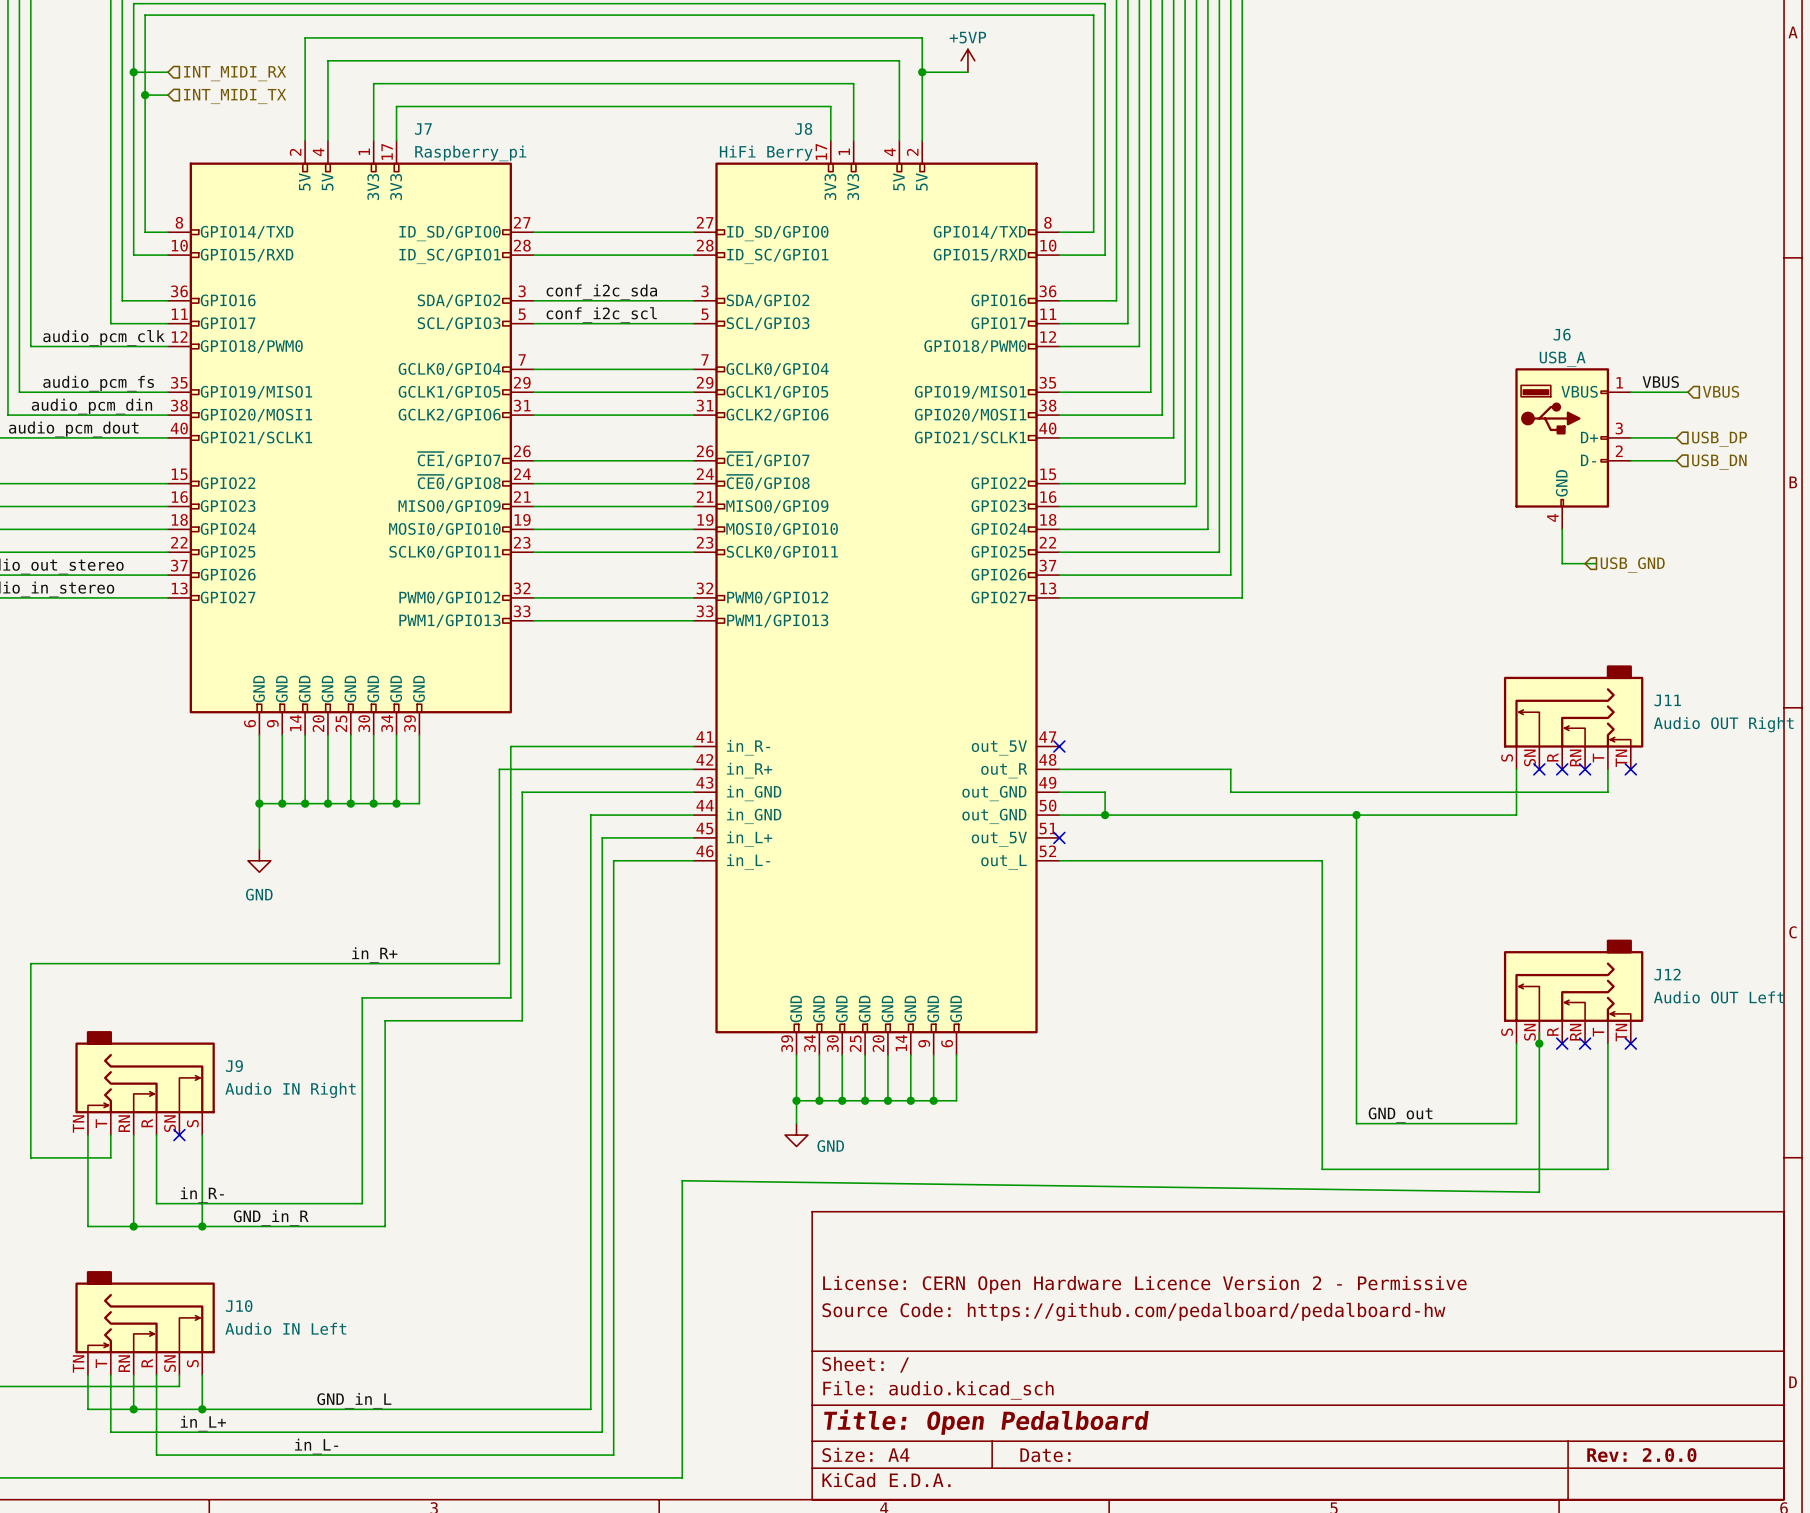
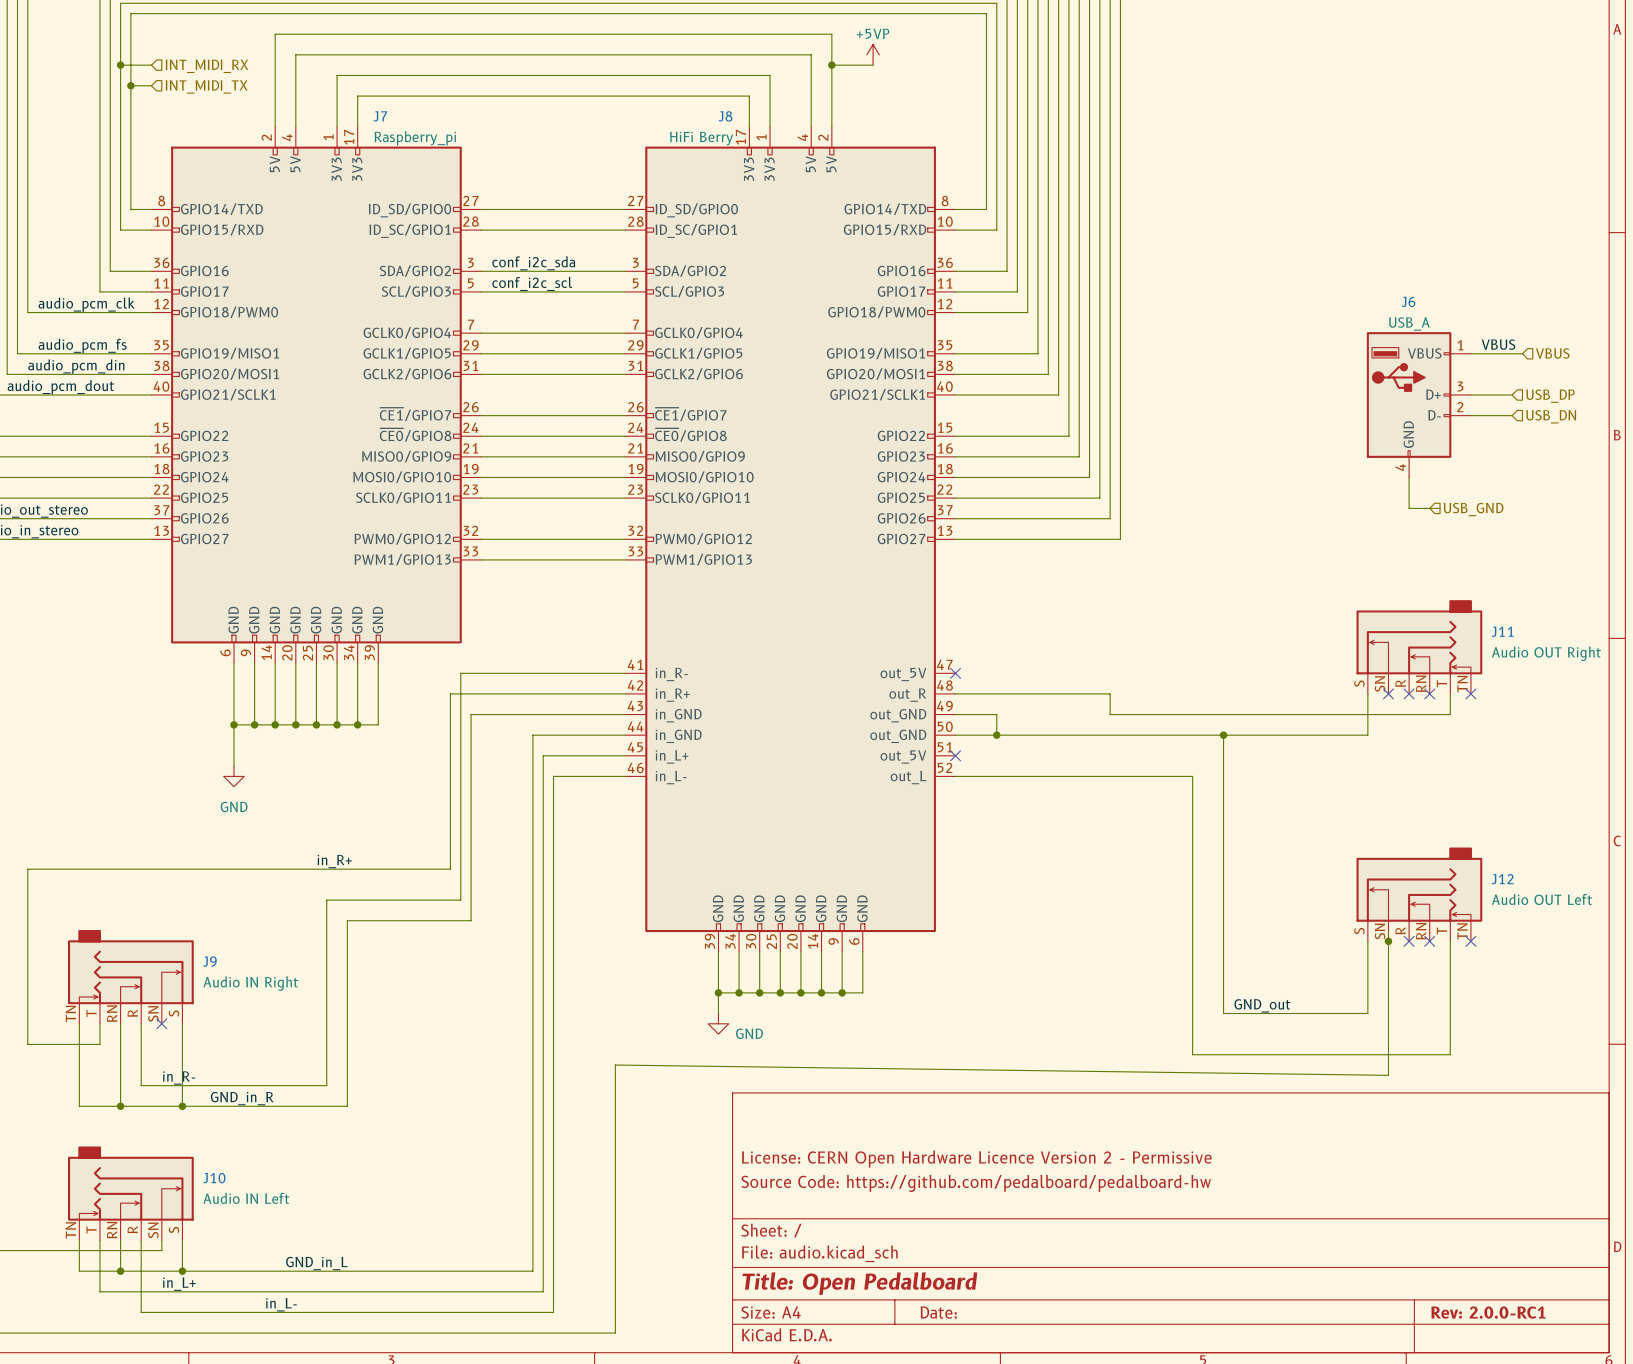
title block: Rev: 2.0.0 (1641, 1455) -> Rev: 2.0.0-RC1 (1488, 1312)

